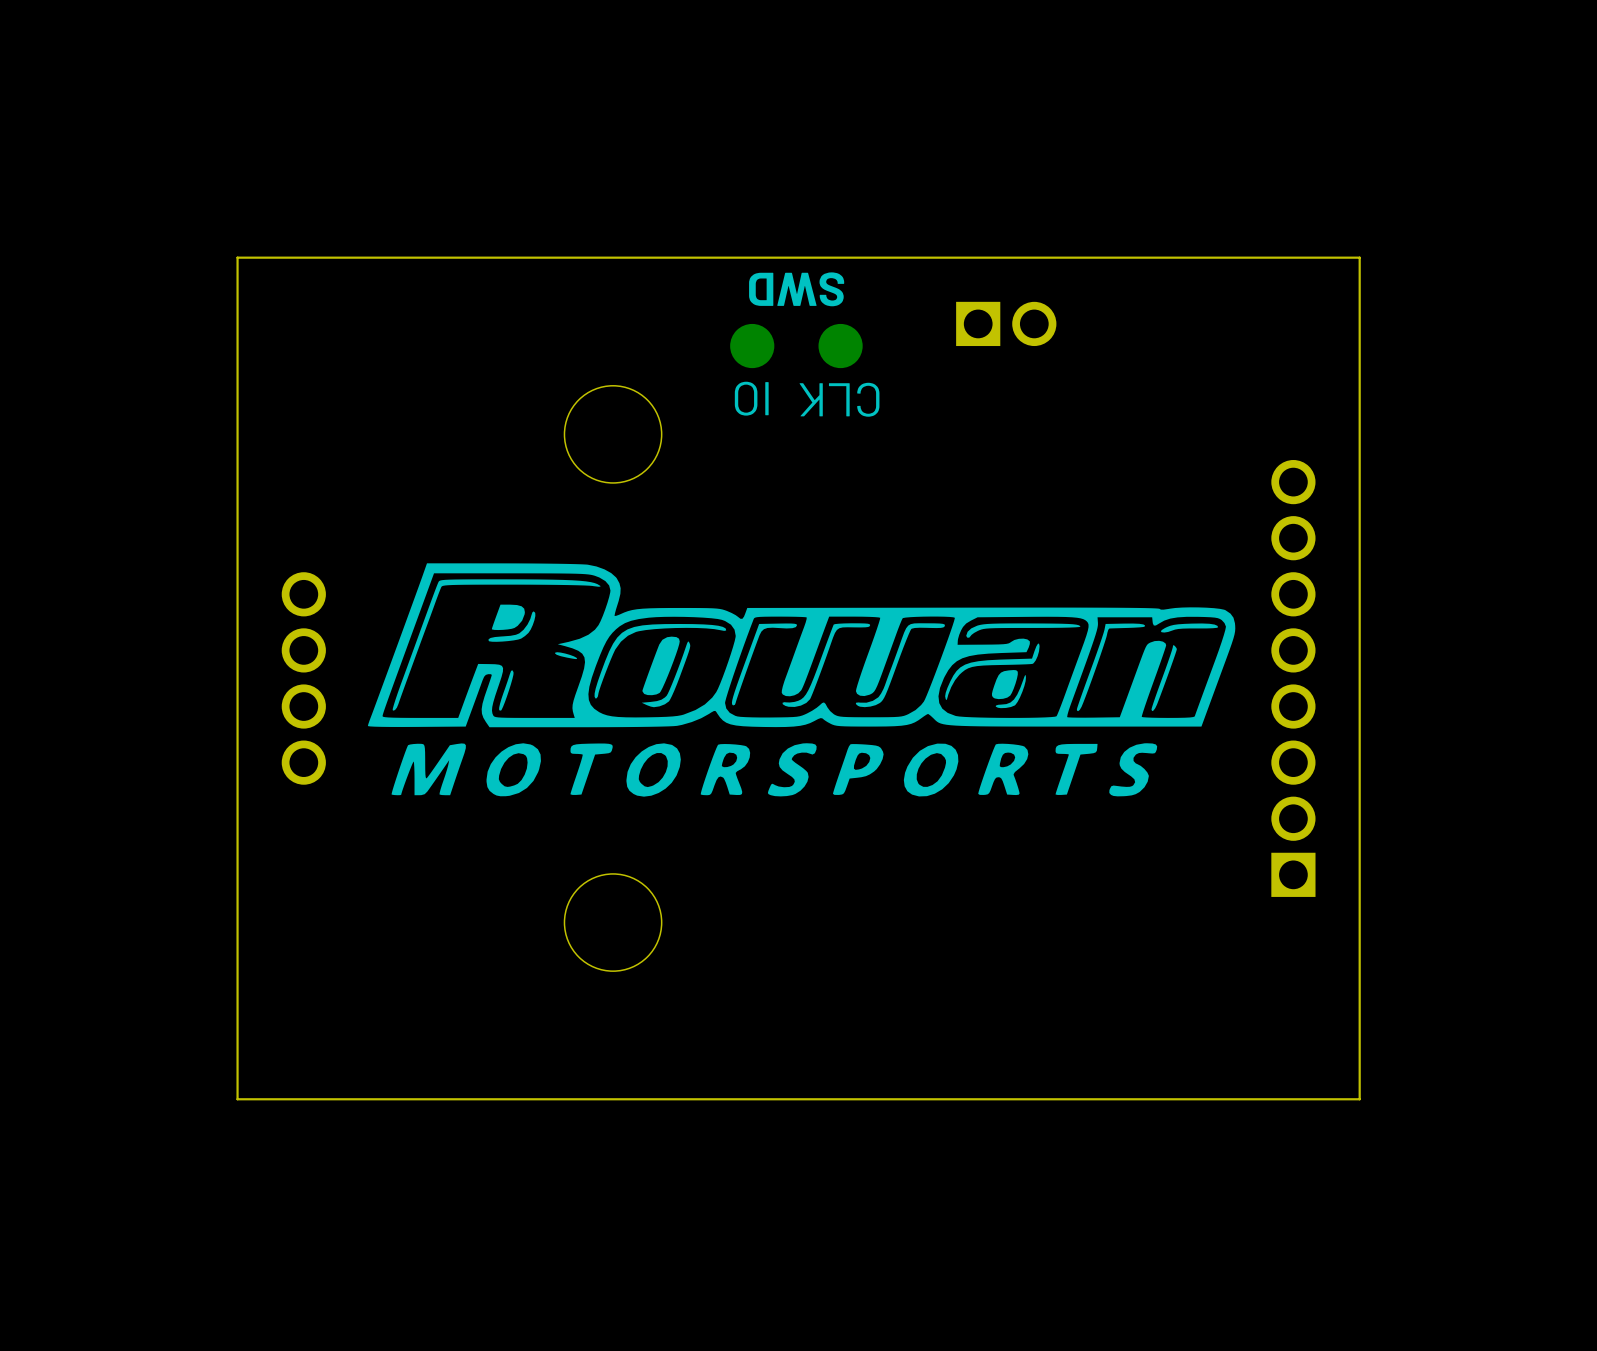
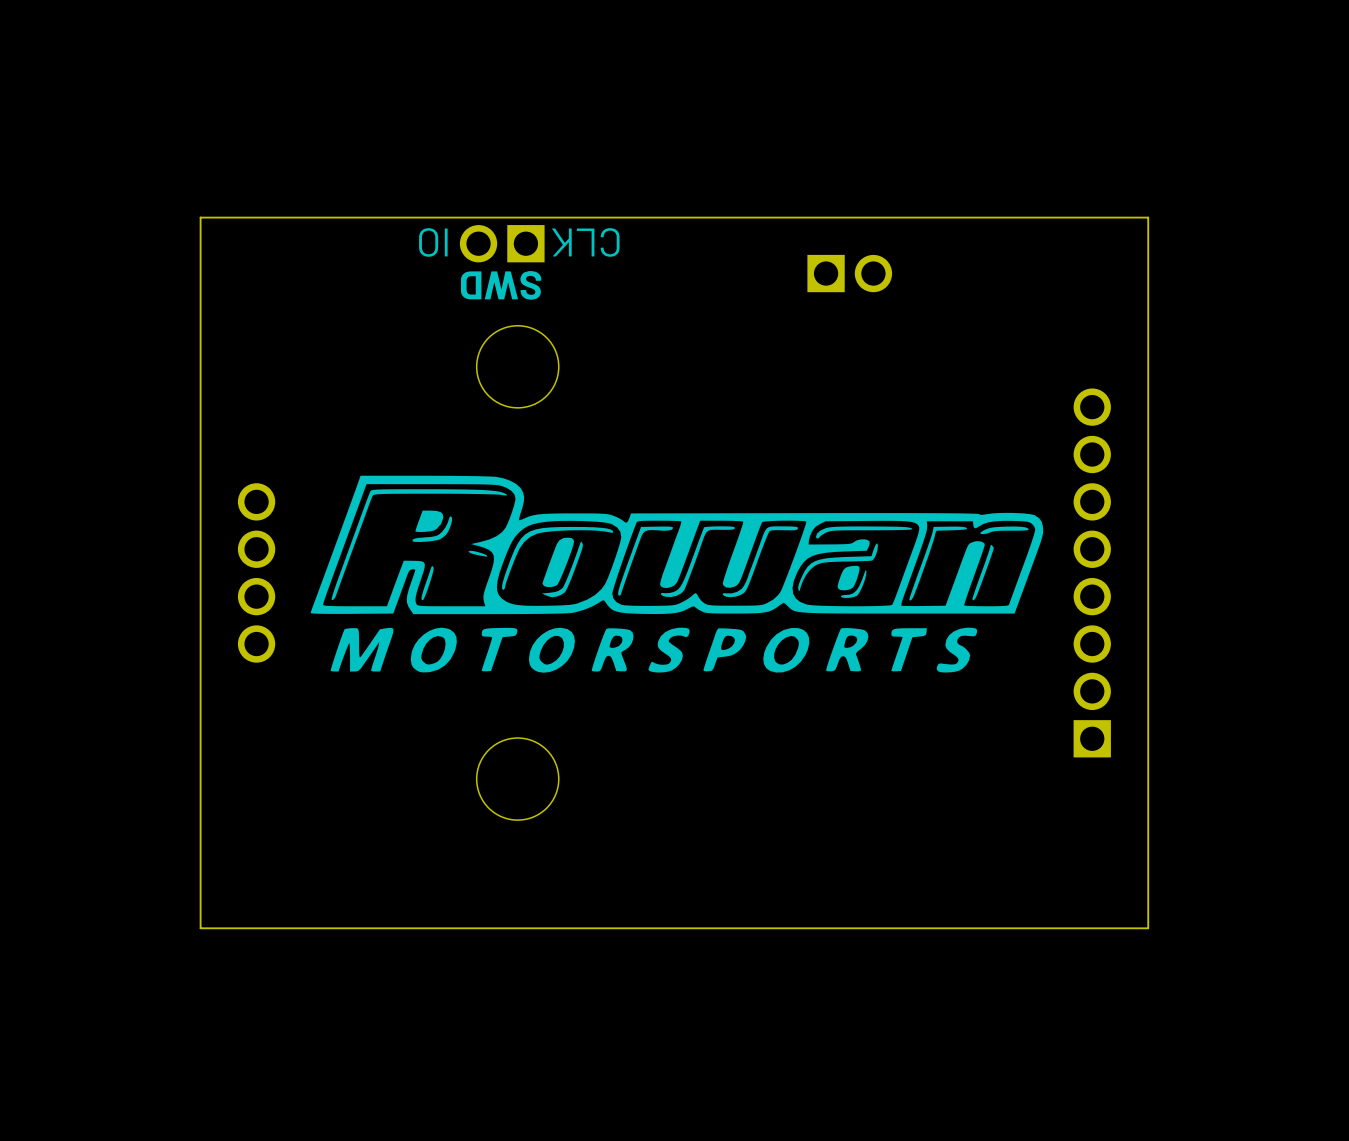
part: none -> (502, 243)
text position: SWD (796, 289) -> SWD (501, 285)
part: (752, 346) -> none
part: (840, 346) -> none
text position: IO (751, 398) -> IO (433, 242)
text position: CLK (839, 399) -> CLK (585, 242)

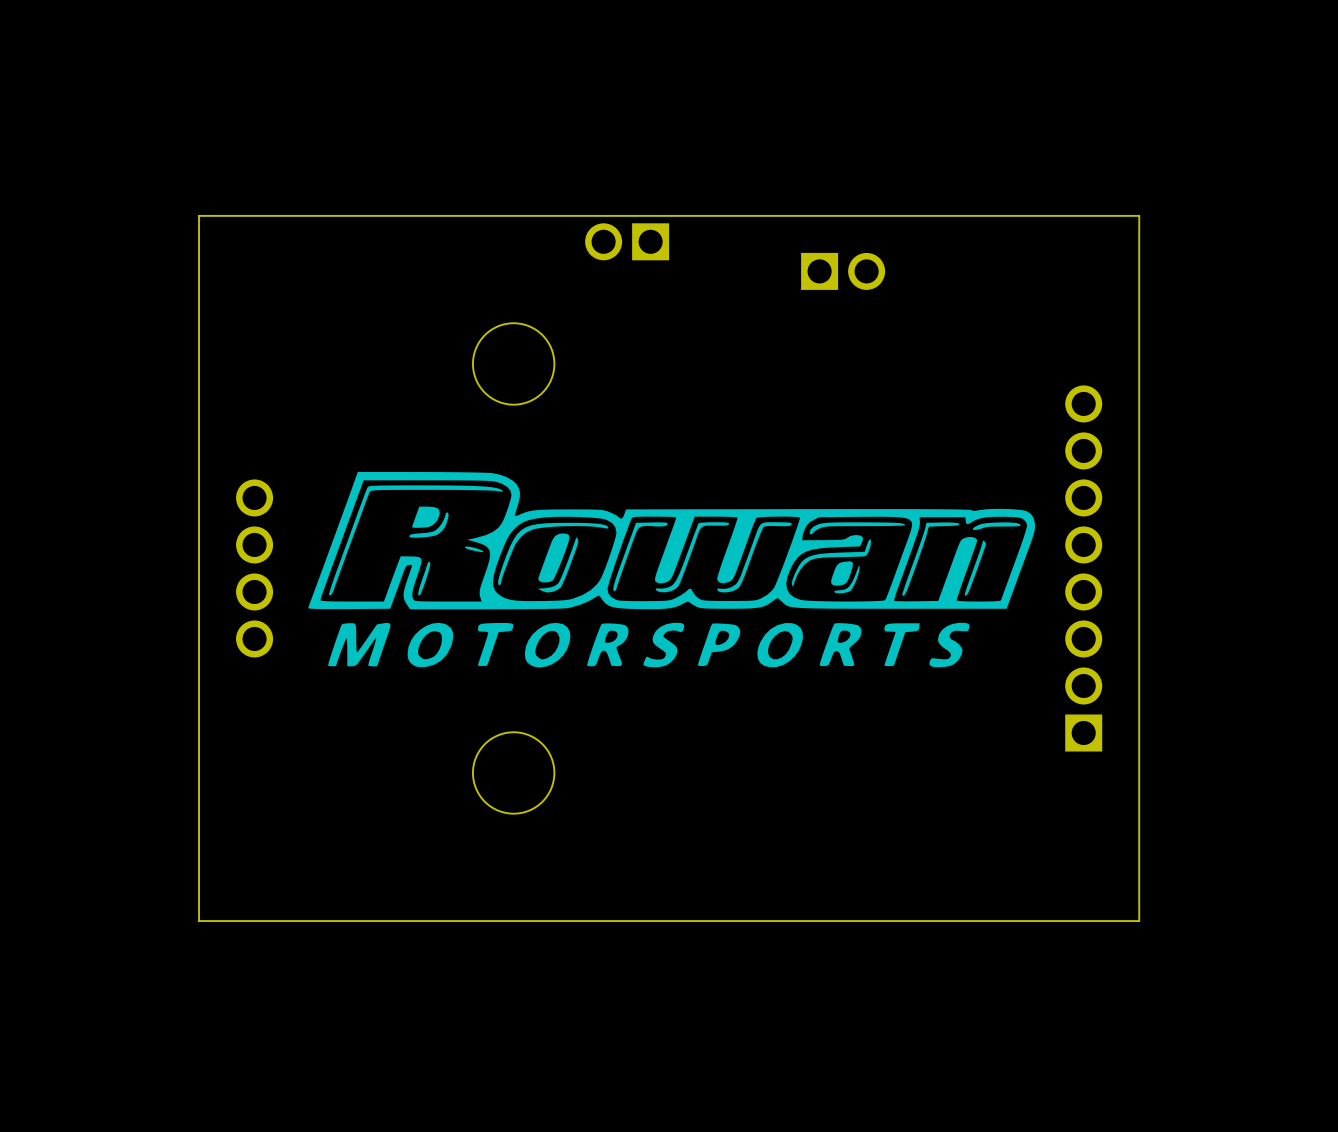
text: IO (433, 242) -> none
text: CLK (585, 242) -> none
part position: (502, 243) -> (627, 241)
text: SWD (501, 285) -> none

